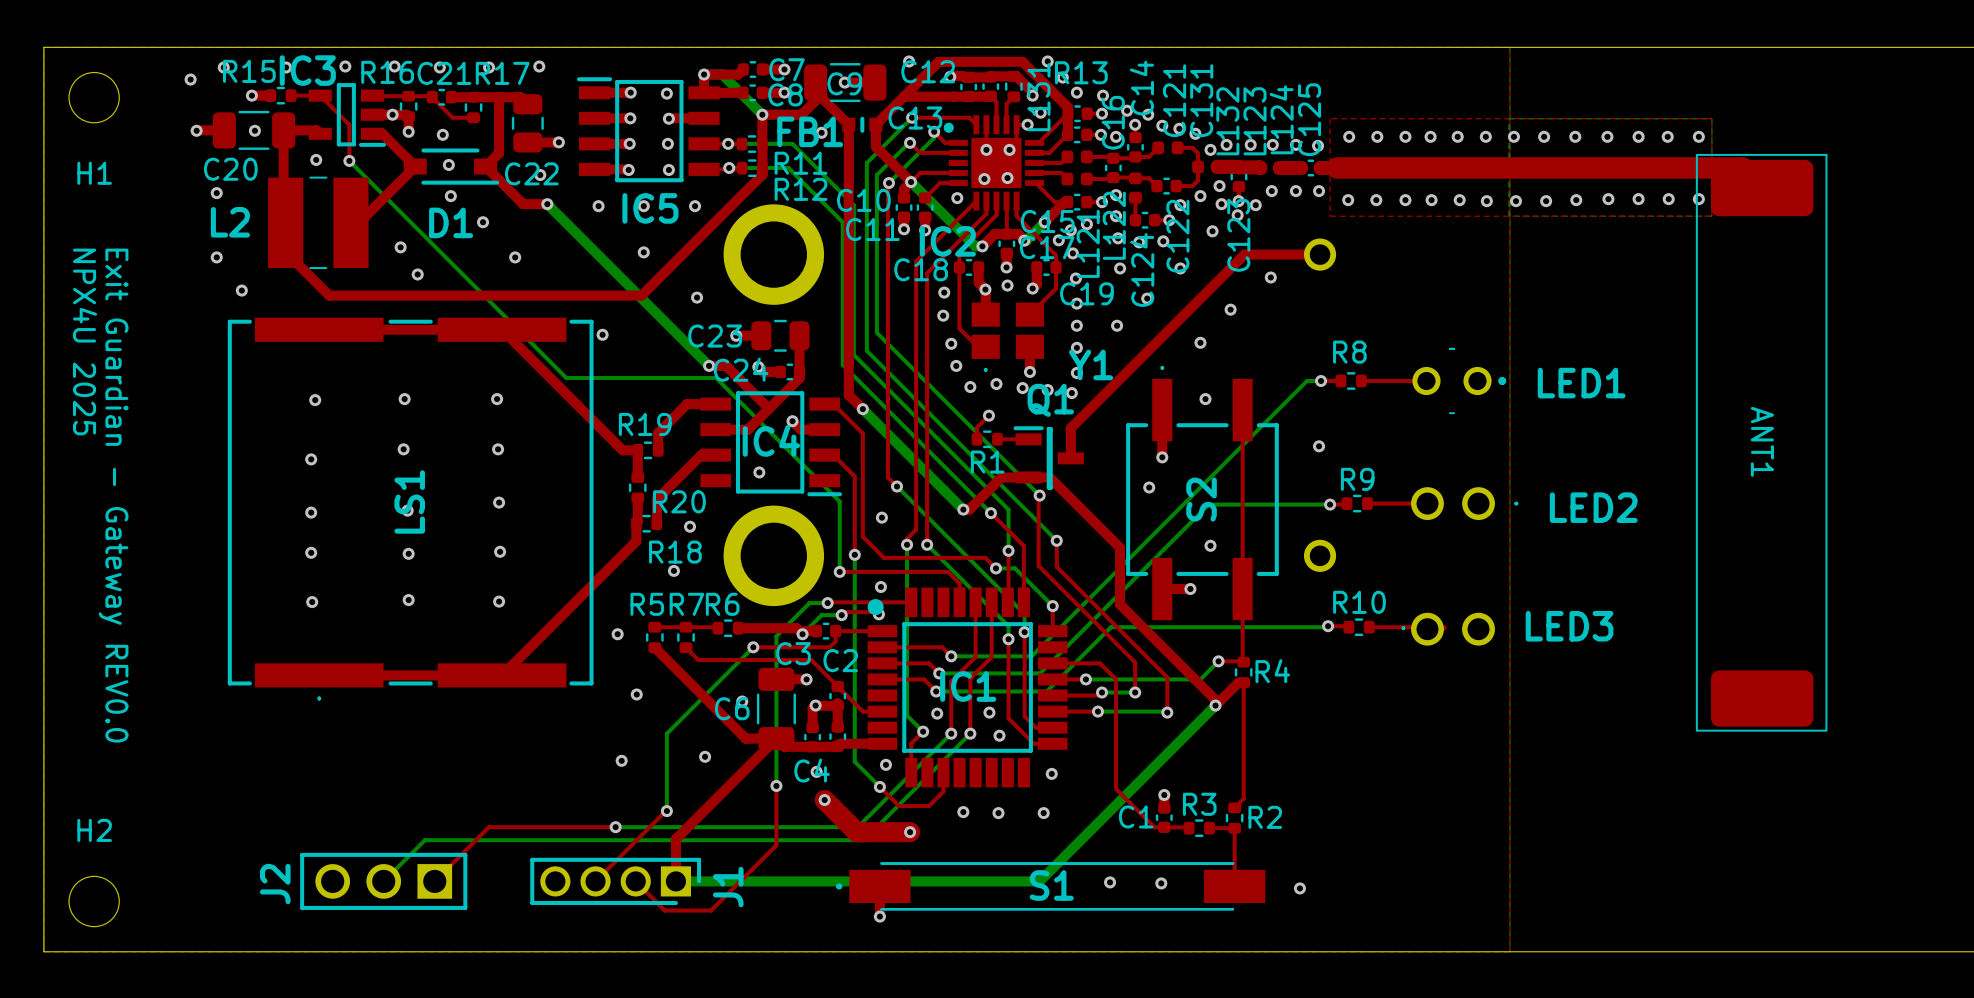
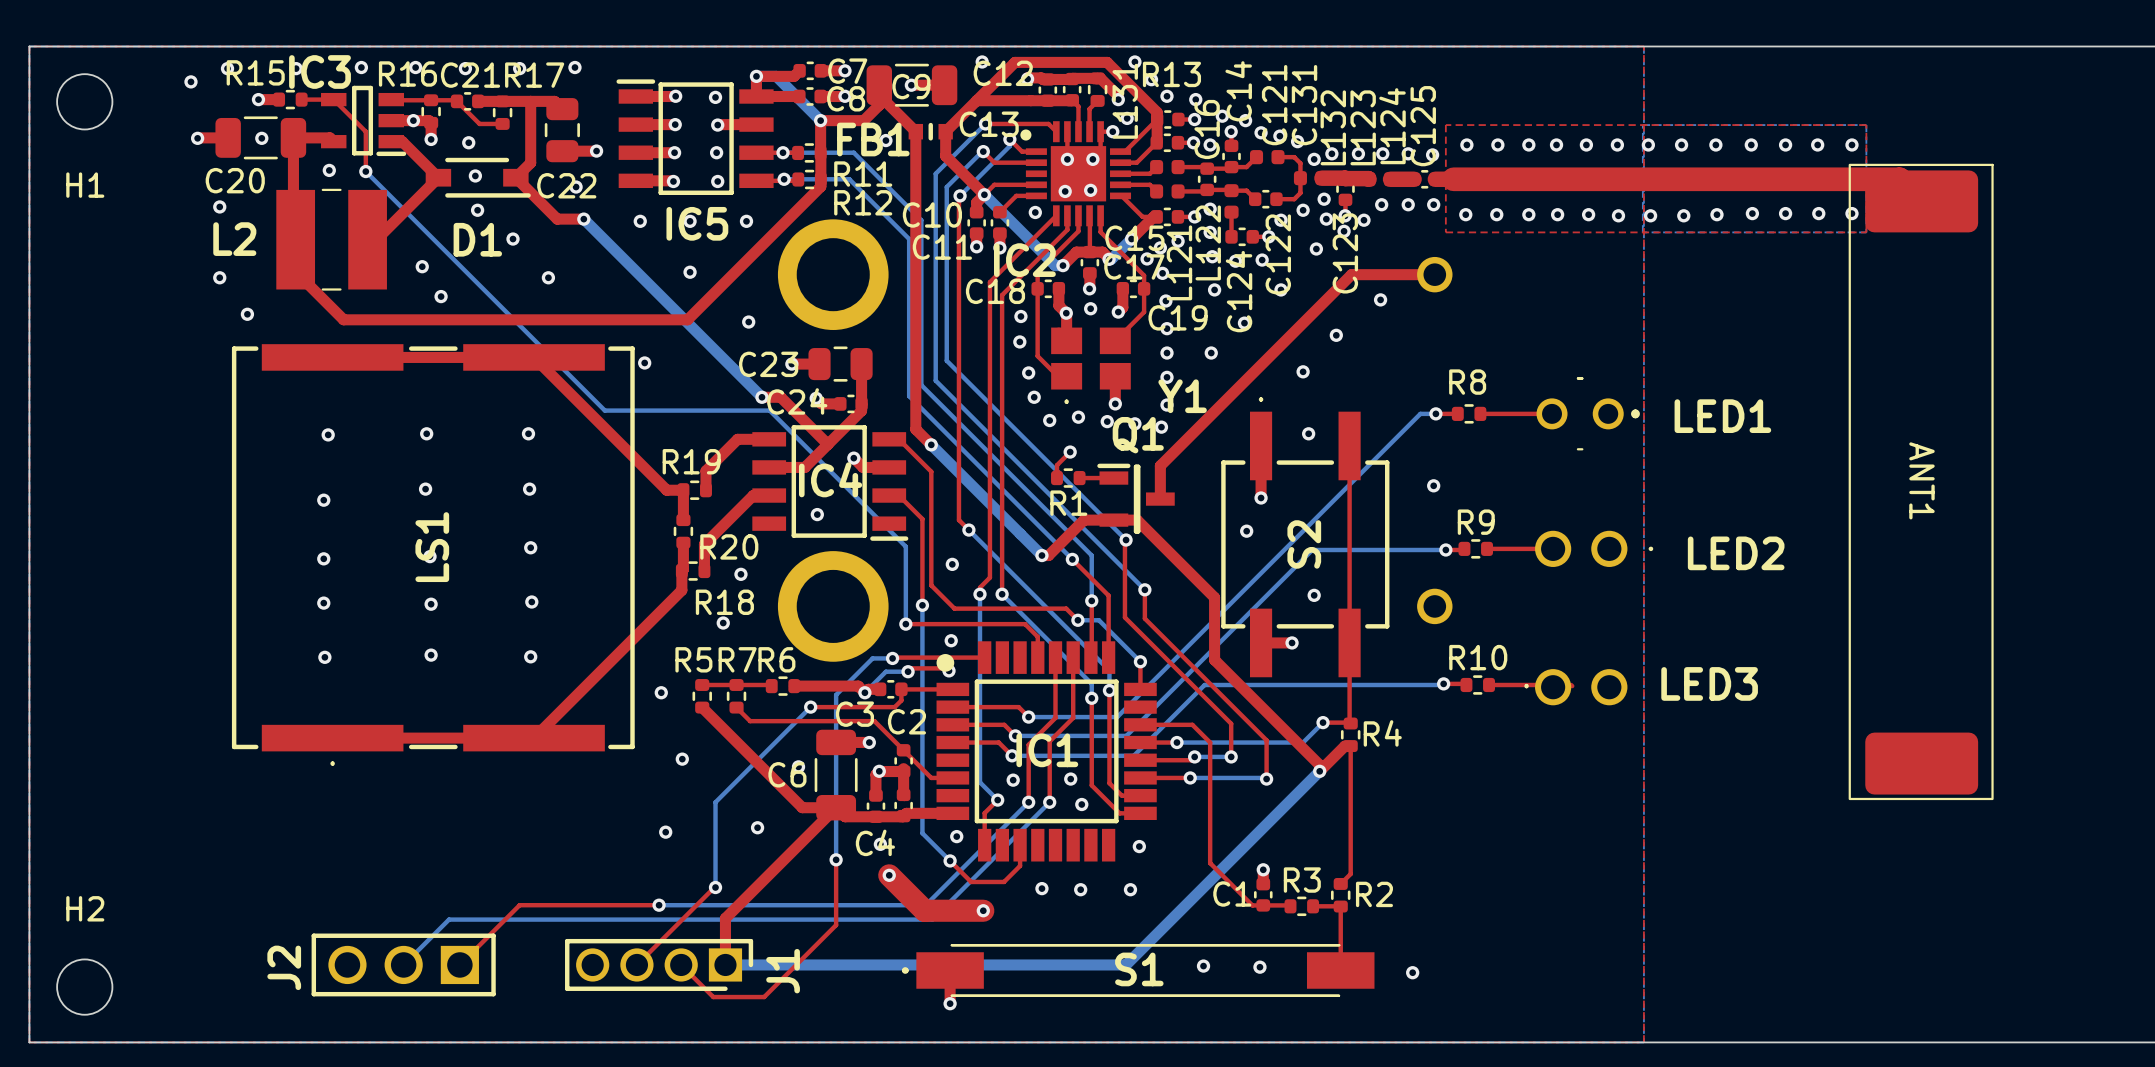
text: NPX4U 2025 (85, 341) -> none
text: Exit Guardian - Gateway REV0.0 (113, 495) -> none

